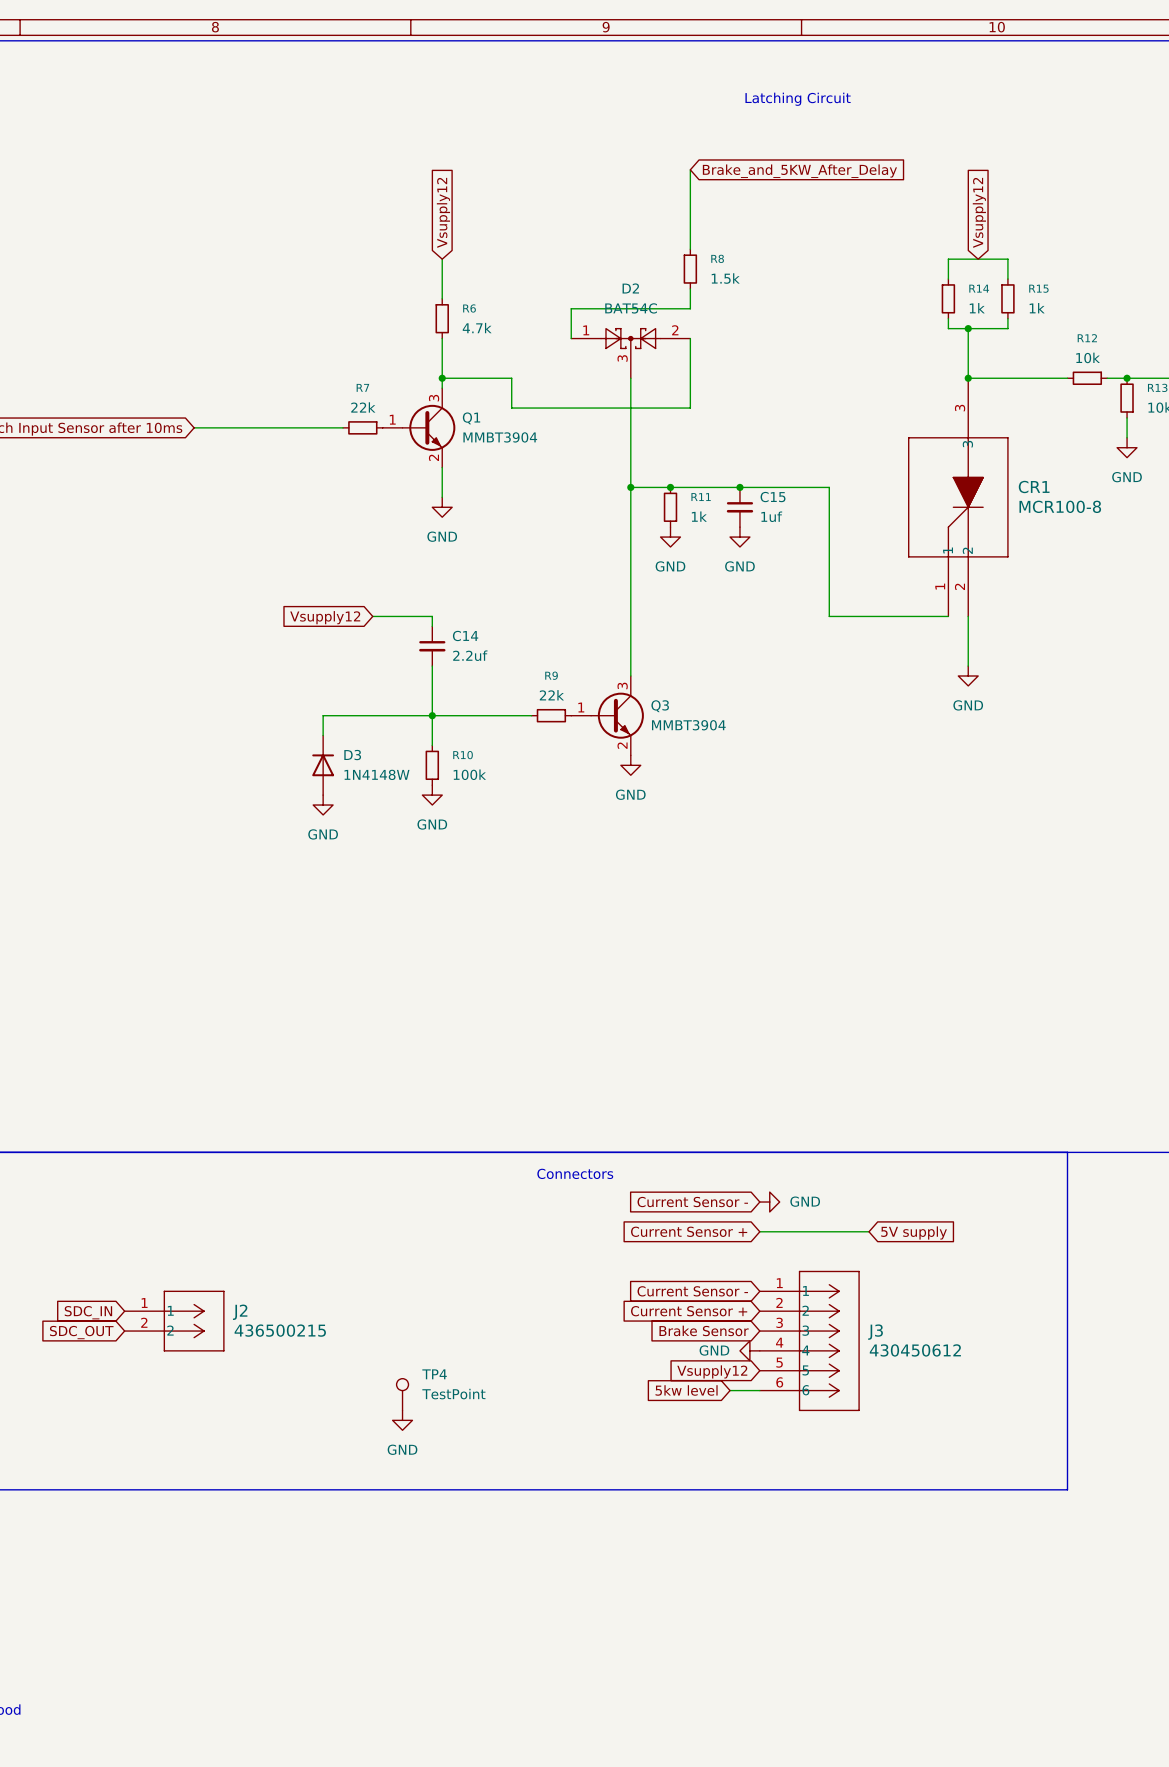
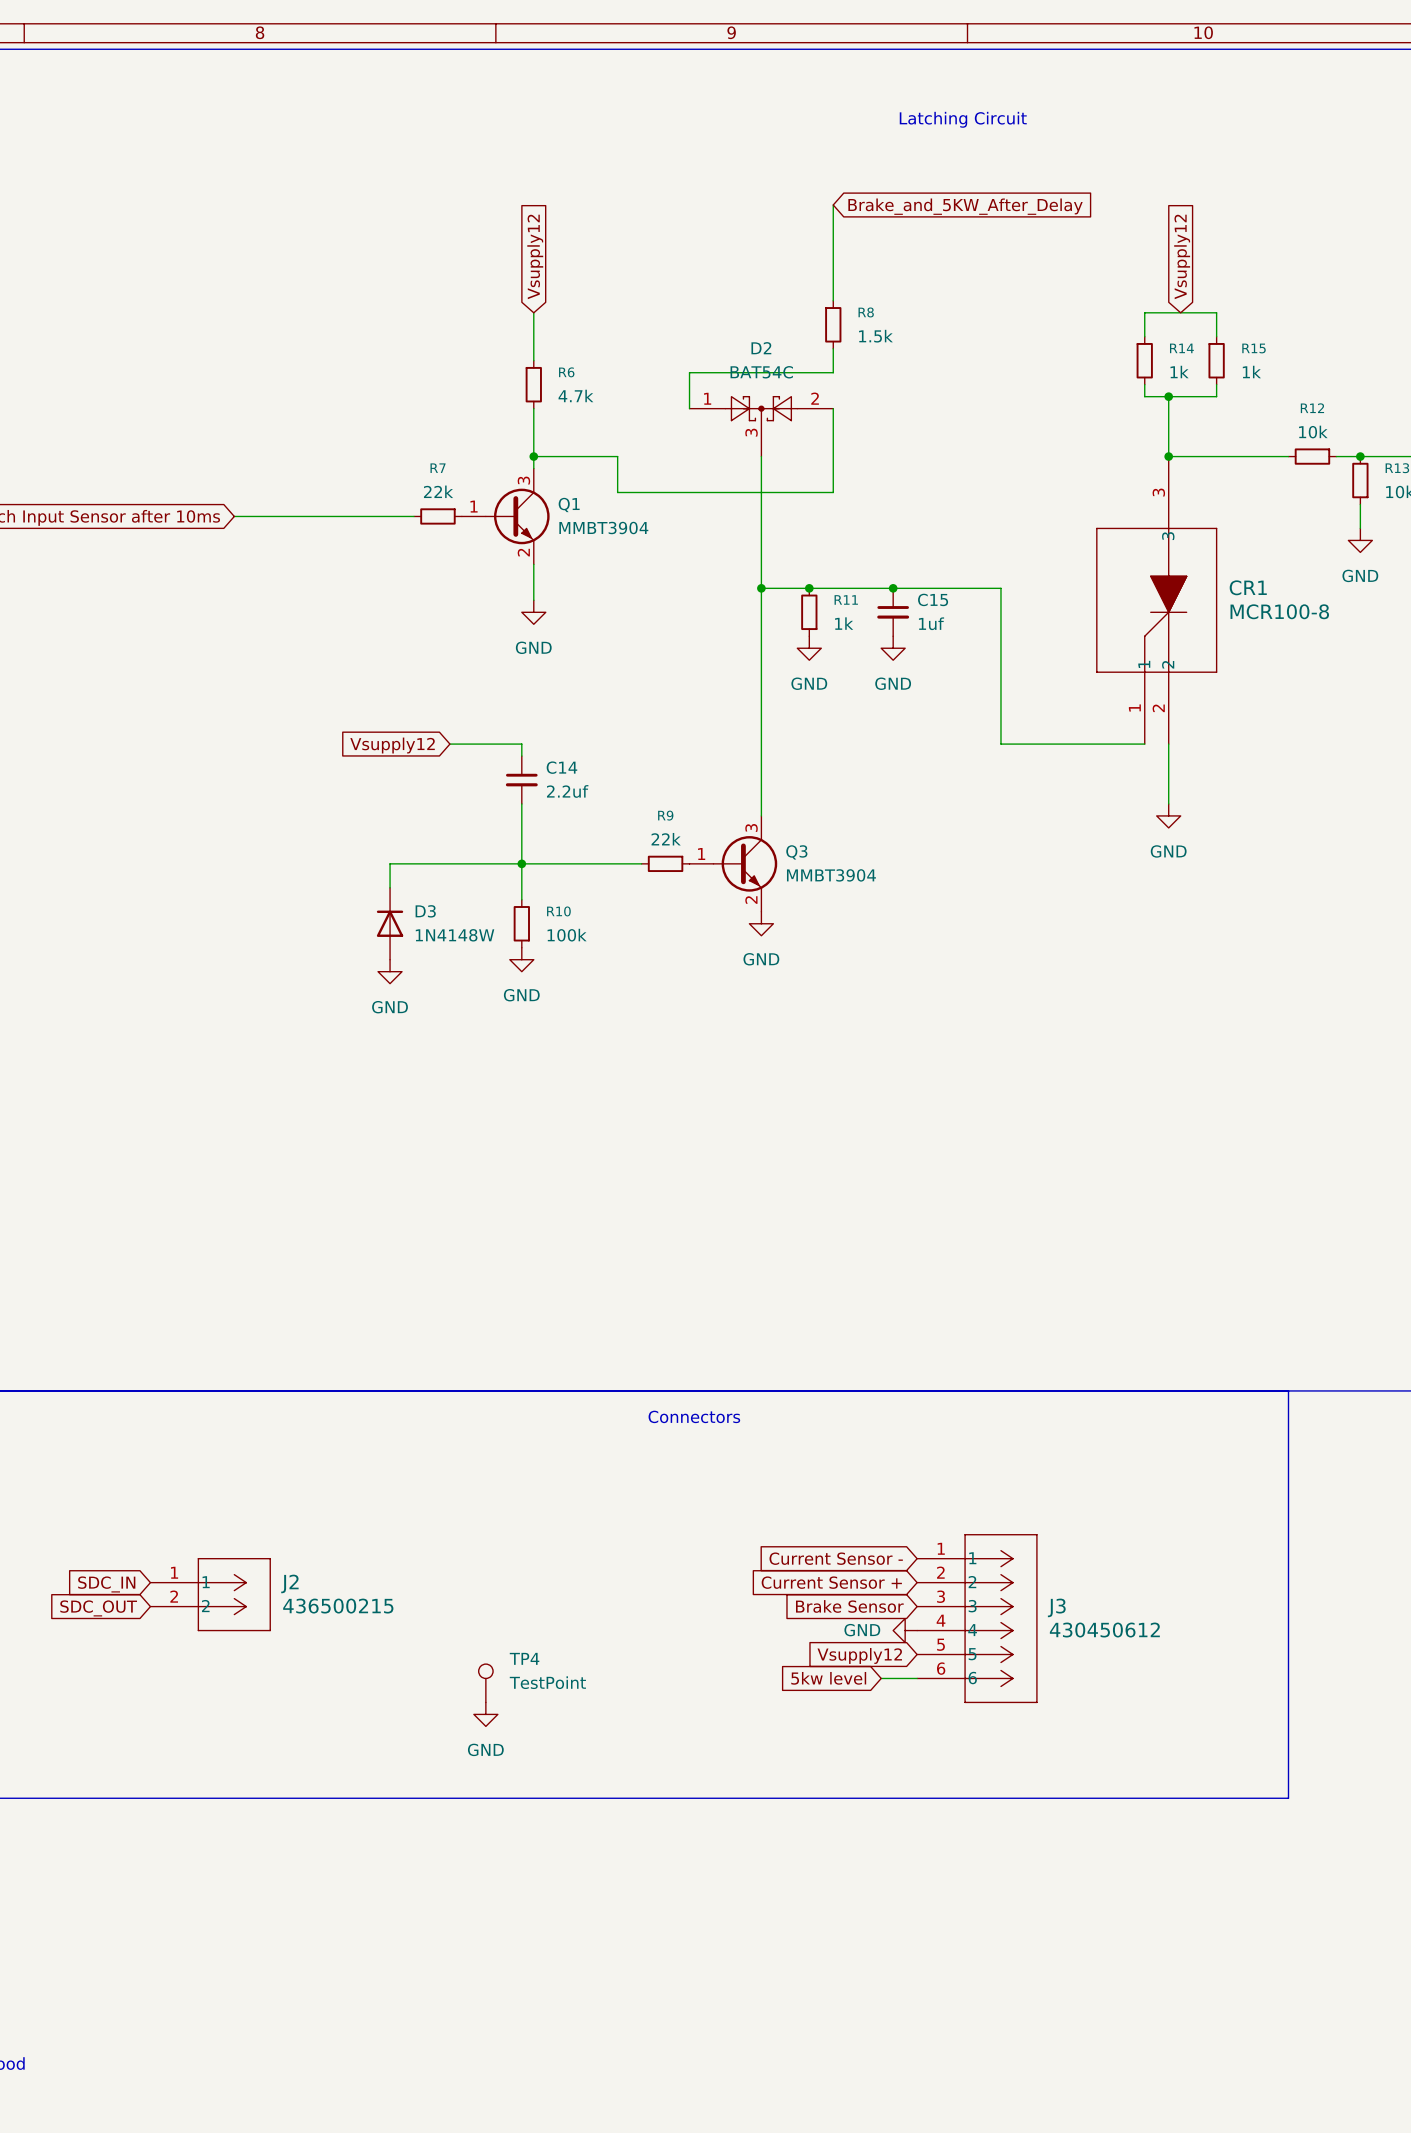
global label: Current Sensor - (692, 1202) -> none
power symbol: GND (769, 1202) -> none
global label: Current Sensor + (689, 1231) -> none
wire: (759, 1231) (869, 1231) -> none
global label: 5V supply (914, 1232) -> none

